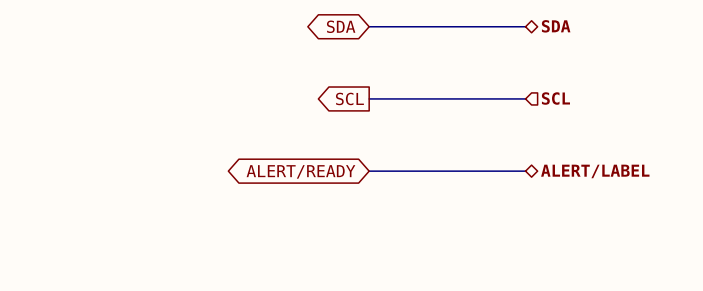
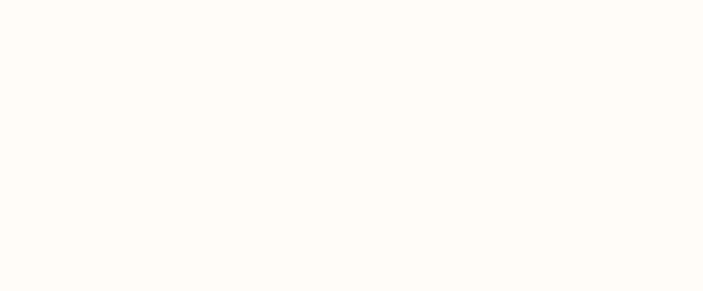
global label: SDA (341, 26) -> none
wire: (369, 26) (525, 26) -> none
hierarchical label: SDA (556, 26) -> none
global label: SCL (349, 98) -> none
wire: (369, 98) (525, 98) -> none
hierarchical label: SCL (555, 98) -> none
global label: ALERT/READY (300, 171) -> none
wire: (369, 171) (525, 171) -> none
hierarchical label: ALERT/LABEL (595, 171) -> none

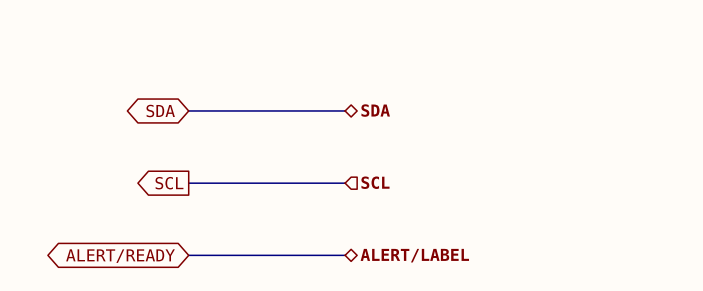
global label: none -> SDA (160, 110)
wire: none -> (188, 110) (345, 110)
hierarchical label: none -> SDA (375, 110)
hierarchical label: none -> SCL (375, 182)
global label: none -> SCL (169, 183)
wire: none -> (188, 183) (345, 183)
wire: none -> (188, 255) (345, 255)
hierarchical label: none -> ALERT/LABEL (414, 255)
global label: none -> ALERT/READY (120, 256)

